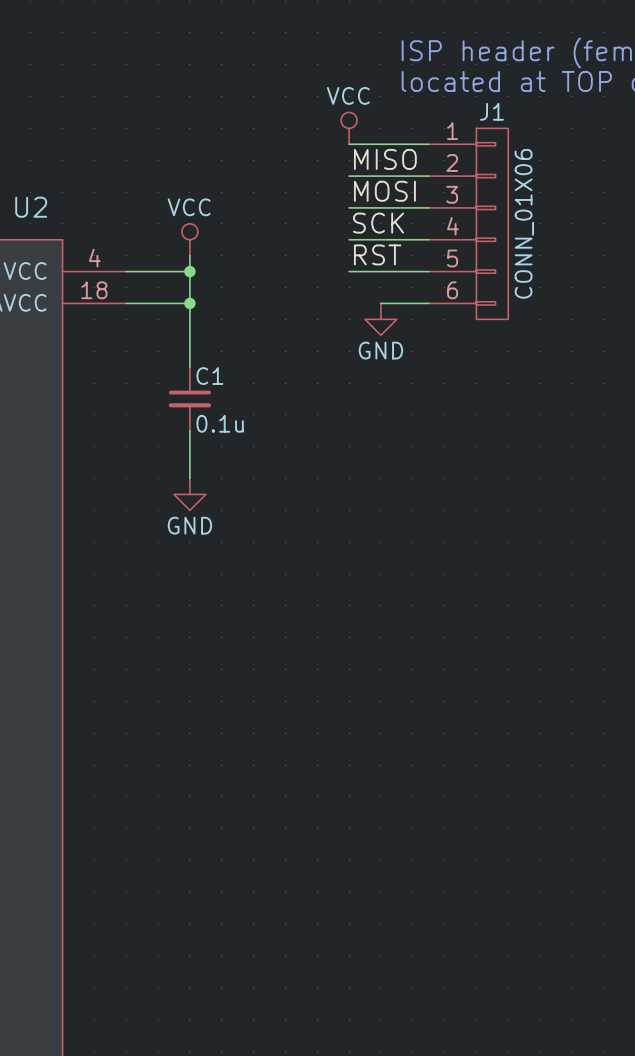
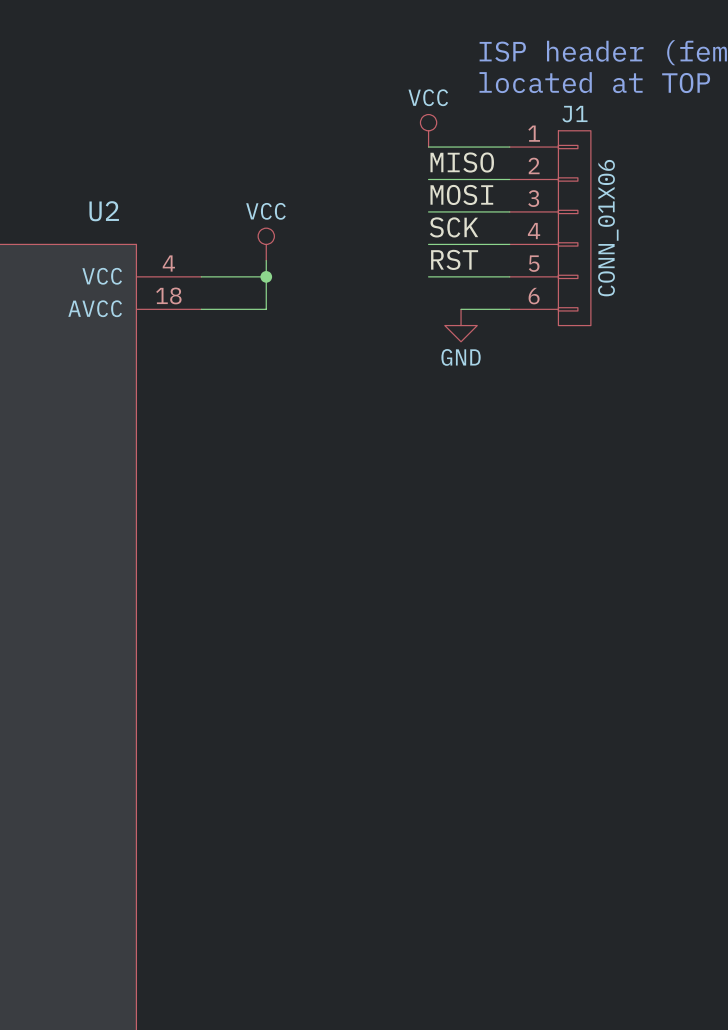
wire: (189, 303) (189, 367) -> none
junction: (189, 303) -> none
C1: 0.1u (189, 398) -> none
wire: (189, 430) (189, 478) -> none
power symbol: GND (189, 494) -> none

